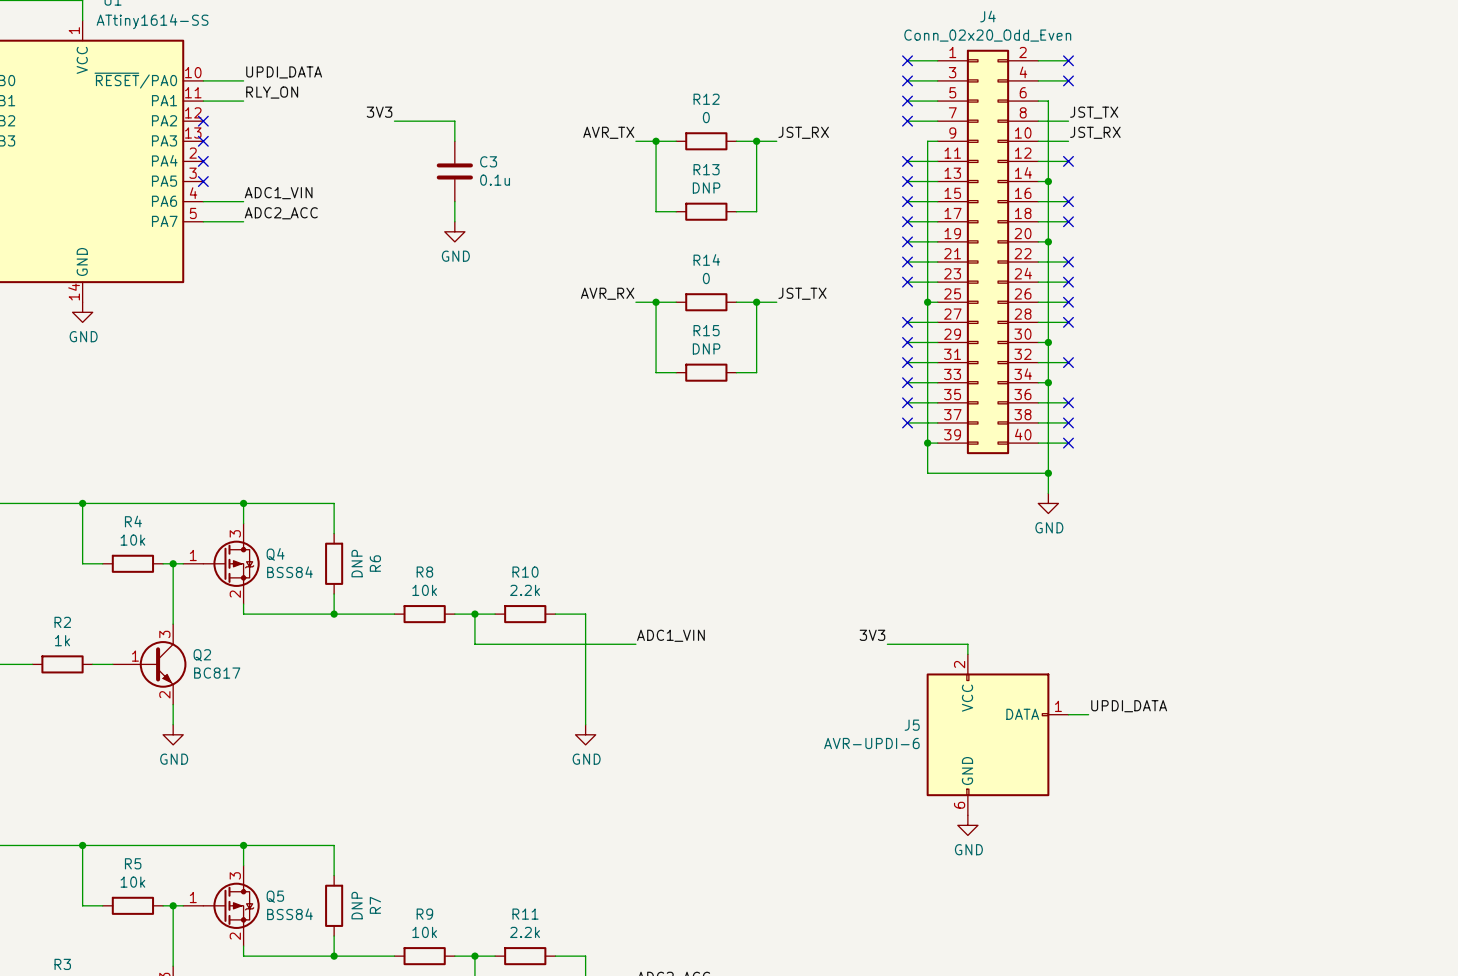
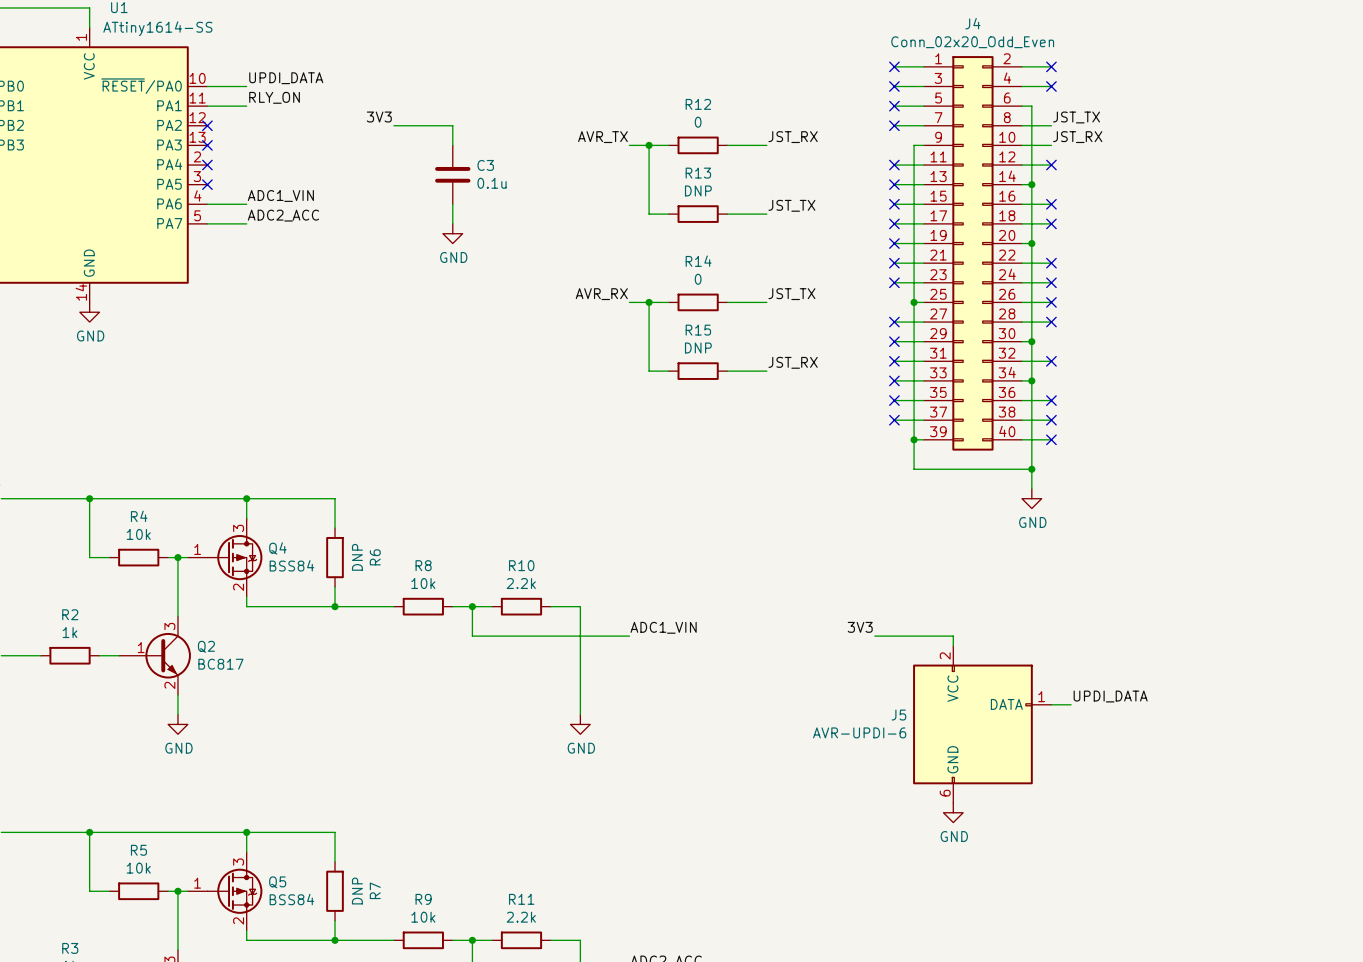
wire: (756, 141) (756, 211) -> (766, 214) (747, 214)
junction: (756, 141) -> none
label: none -> JST_TX (791, 205)
wire: (756, 302) (756, 372) -> (766, 371) (747, 371)
junction: (756, 302) -> none
label: none -> JST_RX (793, 362)

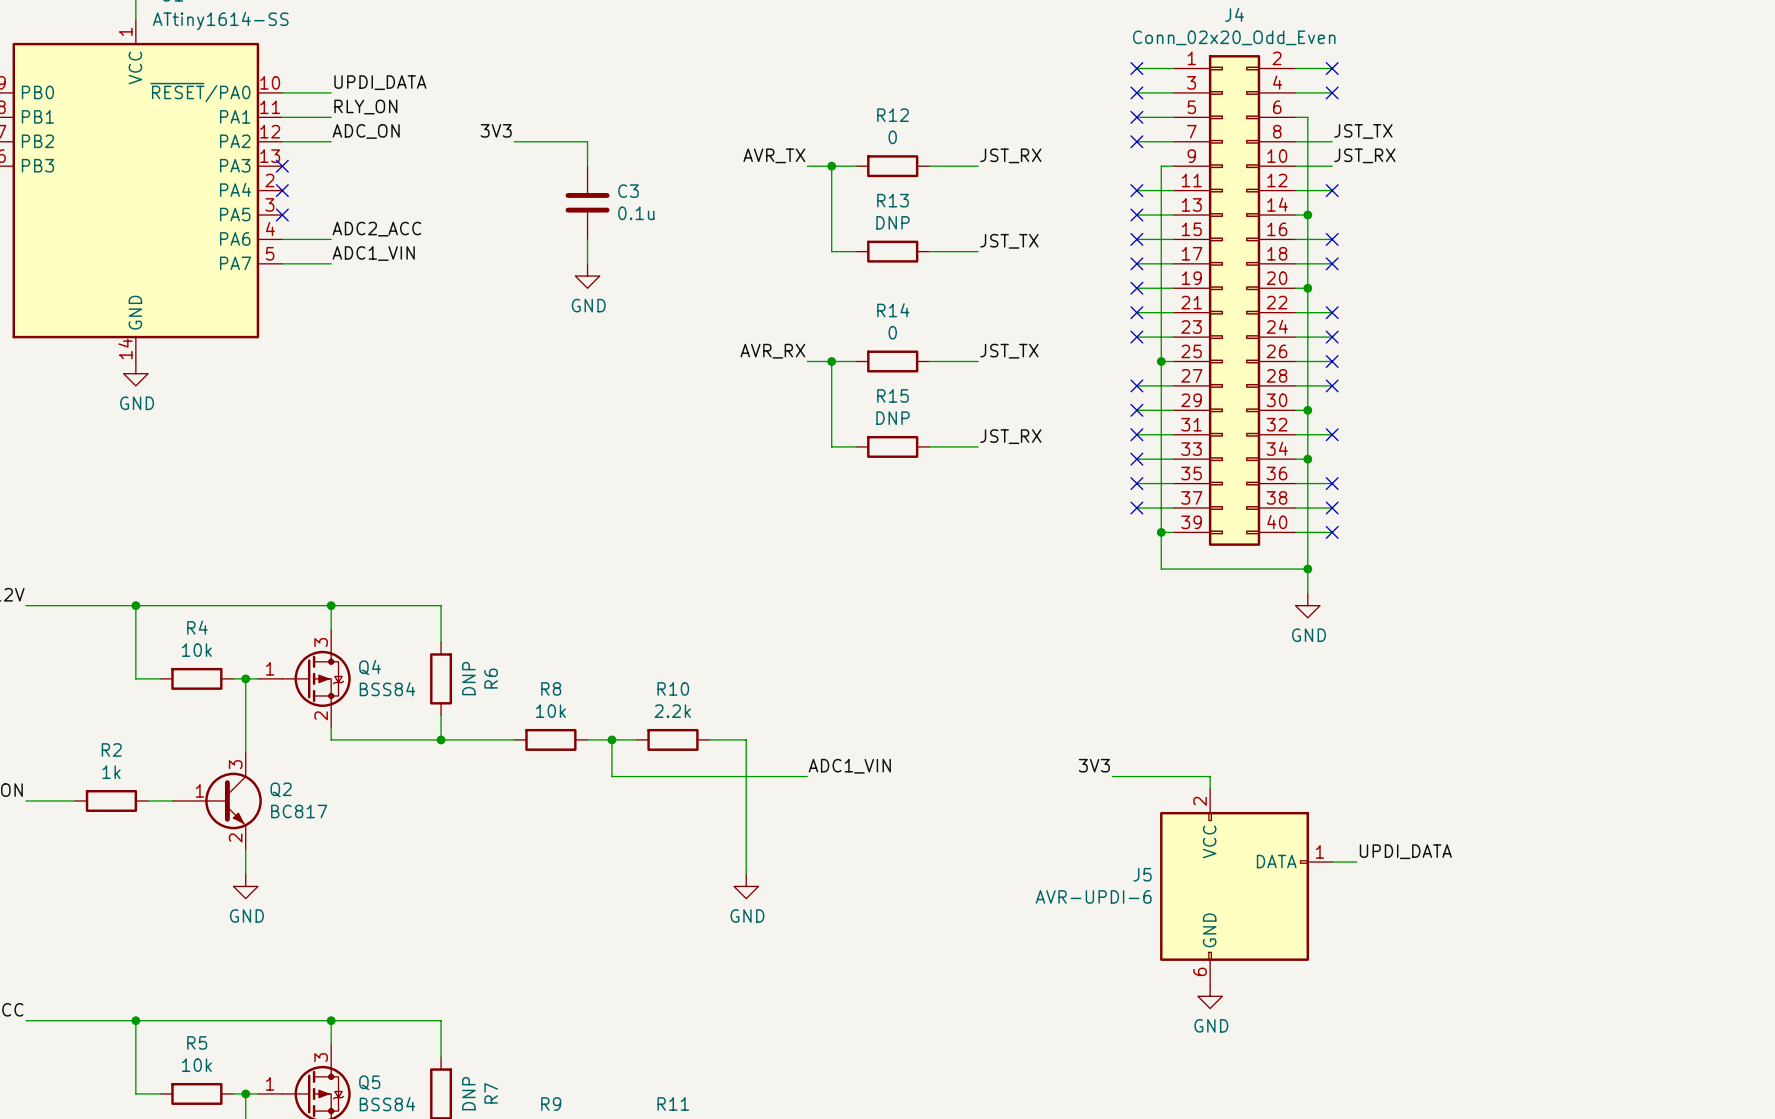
label: none -> ADC_ON (366, 131)
wire: none -> (282, 141) (331, 141)
no-connect mark: (207, 125) -> none
label: ADC1_VIN (280, 195) -> ADC2_ACC (376, 229)
label: ADC2_ACC (283, 215) -> ADC1_VIN (373, 253)

